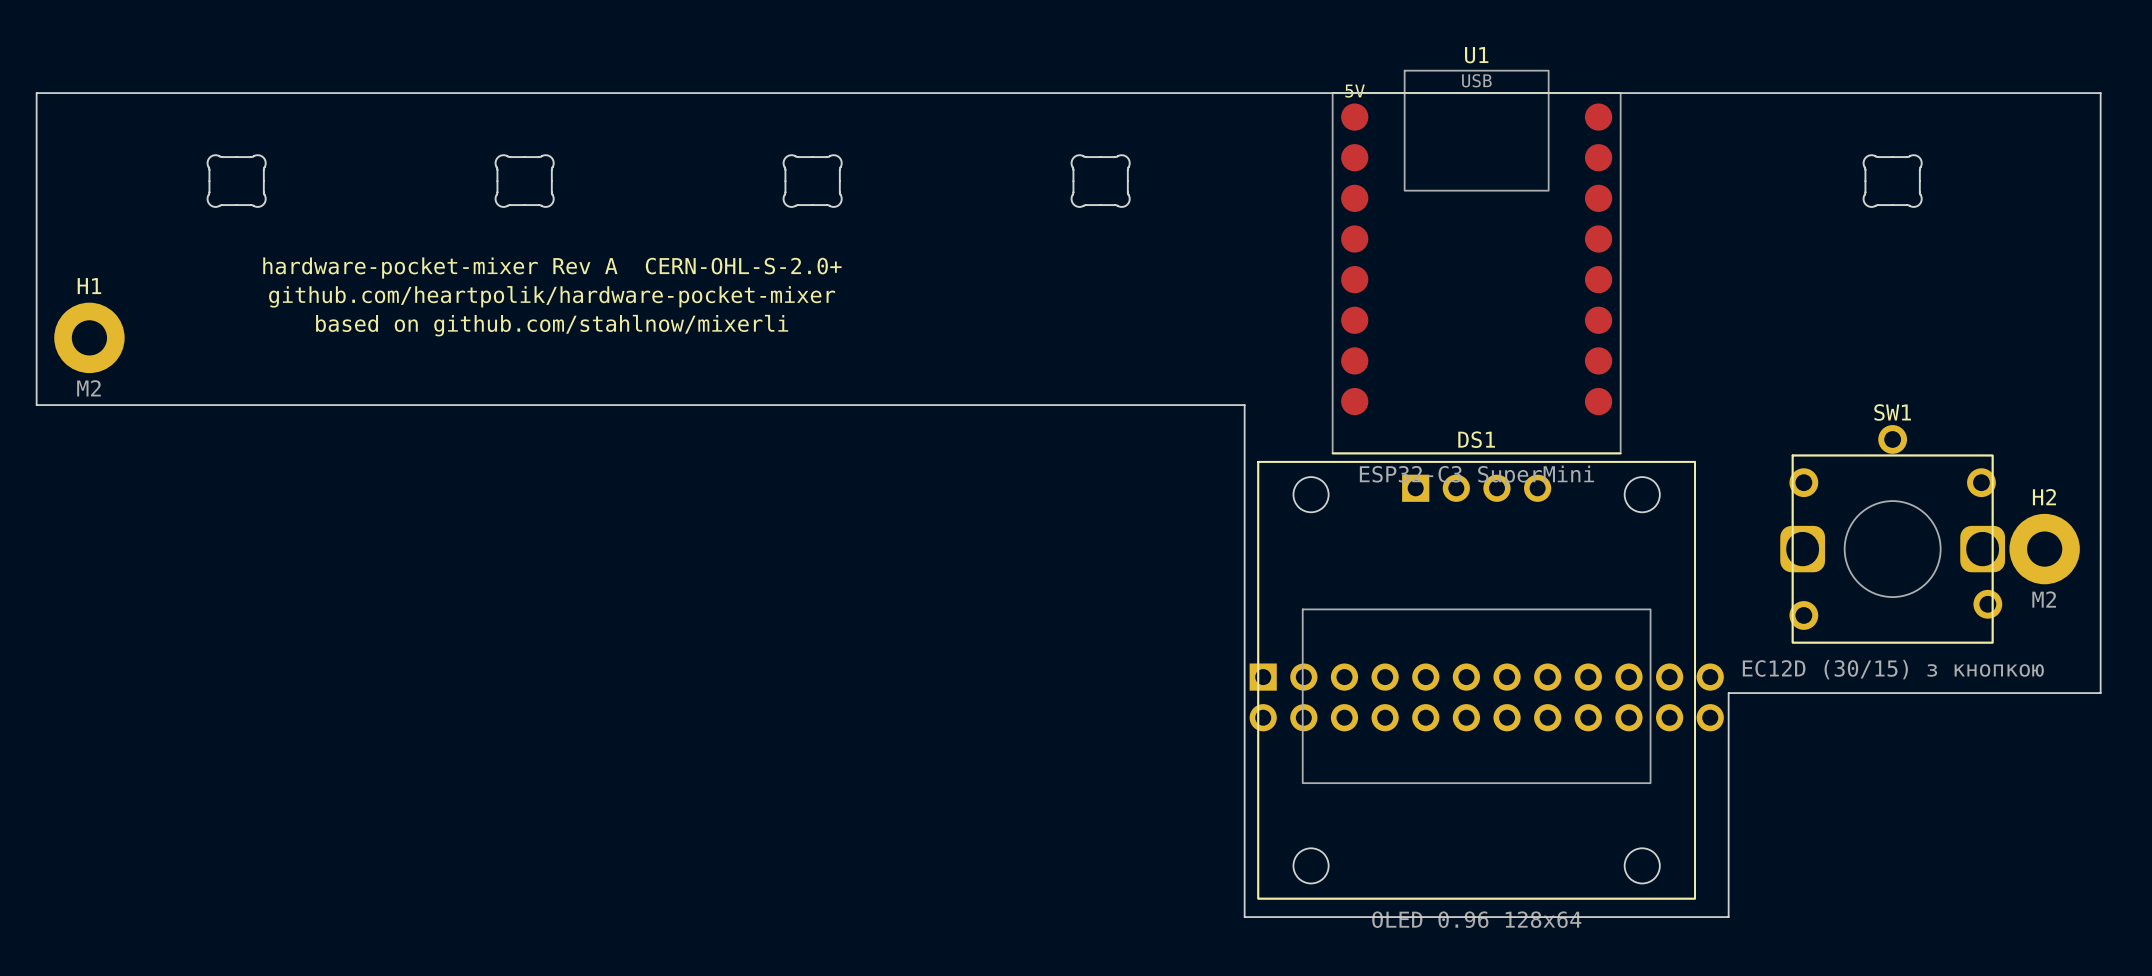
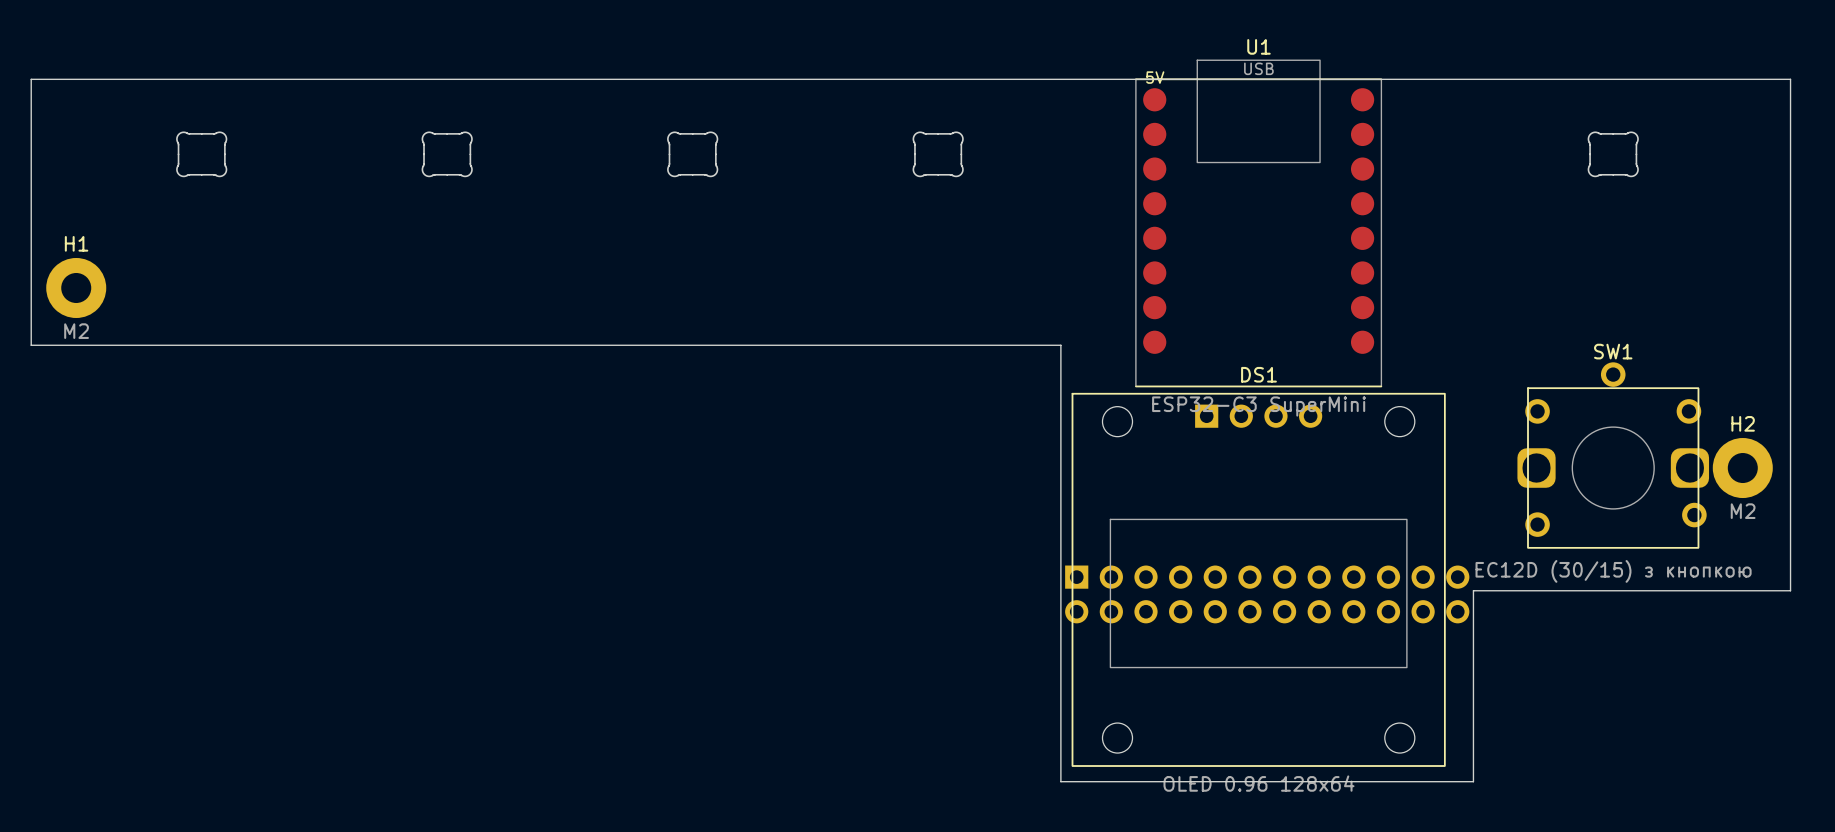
text: hardware-pocket-mixer Rev A CERN-OHL-S-2.0+ (552, 268) -> none
text: github.com/heartpolik/hardware-pocket-mixer (552, 296) -> none
text: based on github.com/stahlnow/mixerli (552, 325) -> none

